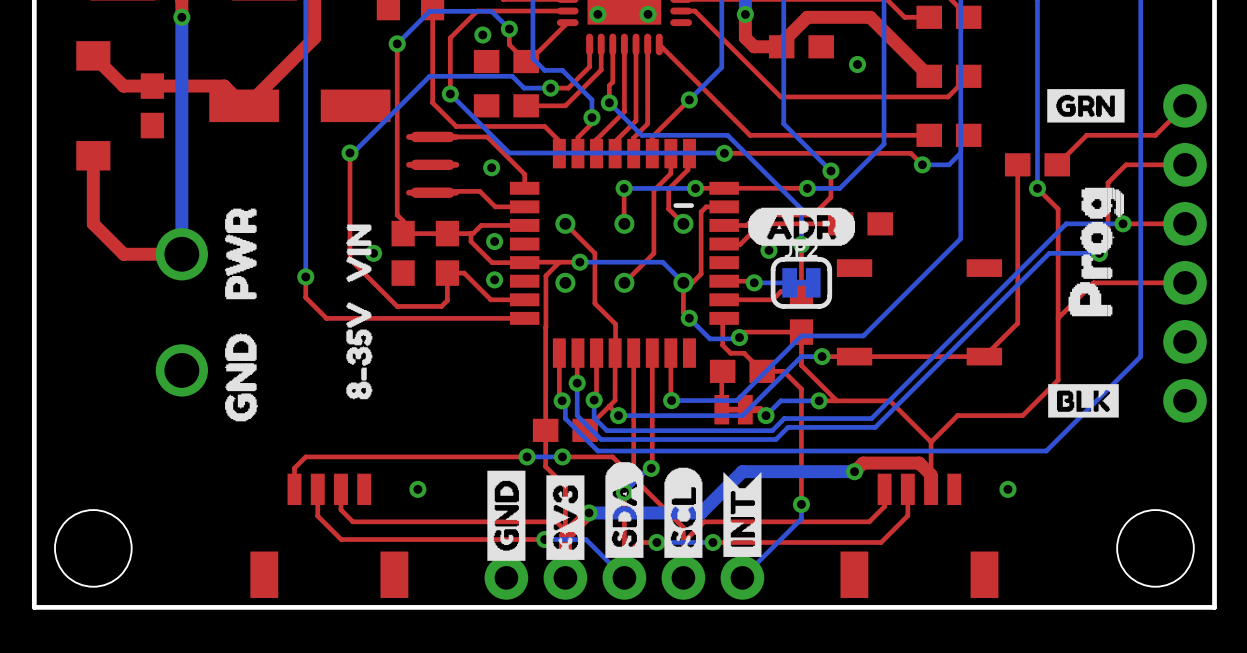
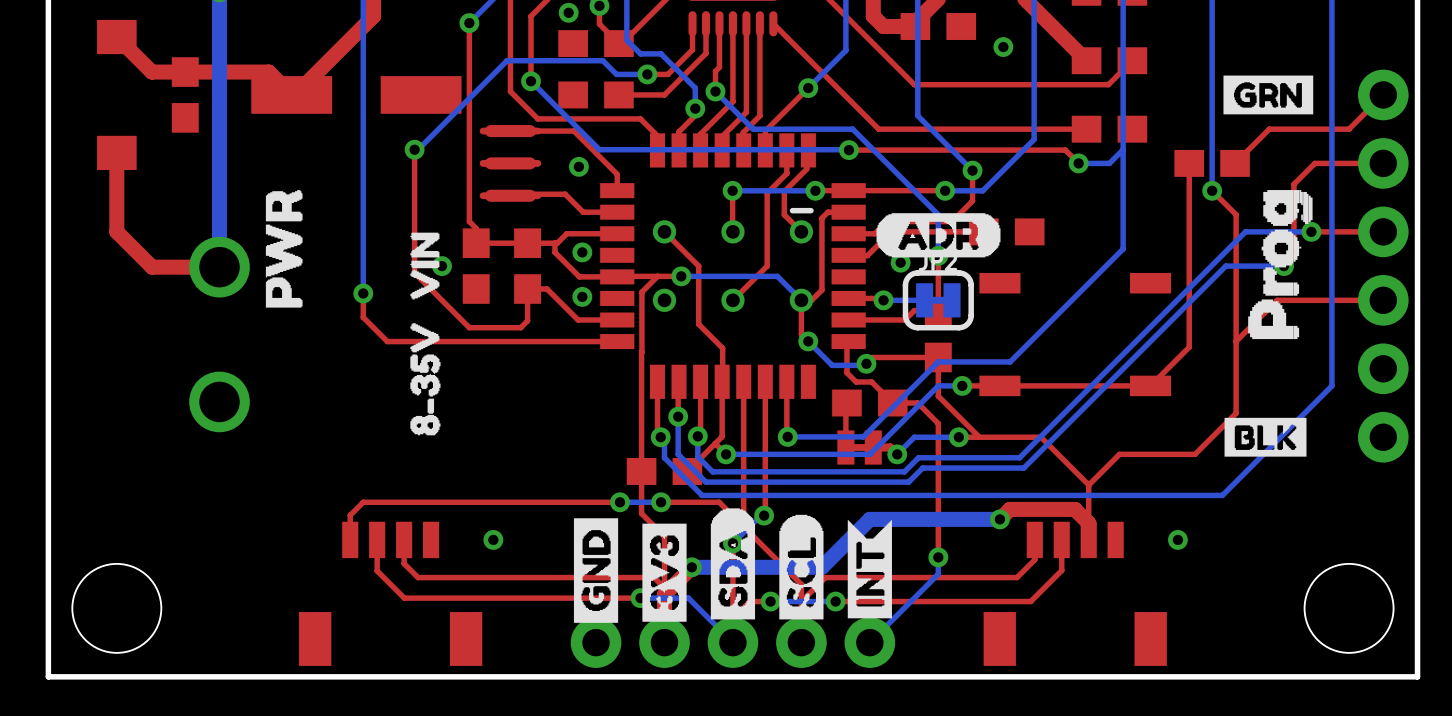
drawing shape: [225, 208, 257, 300] -> [265, 190, 303, 308]
drawing: [225, 333, 258, 422] -> none

